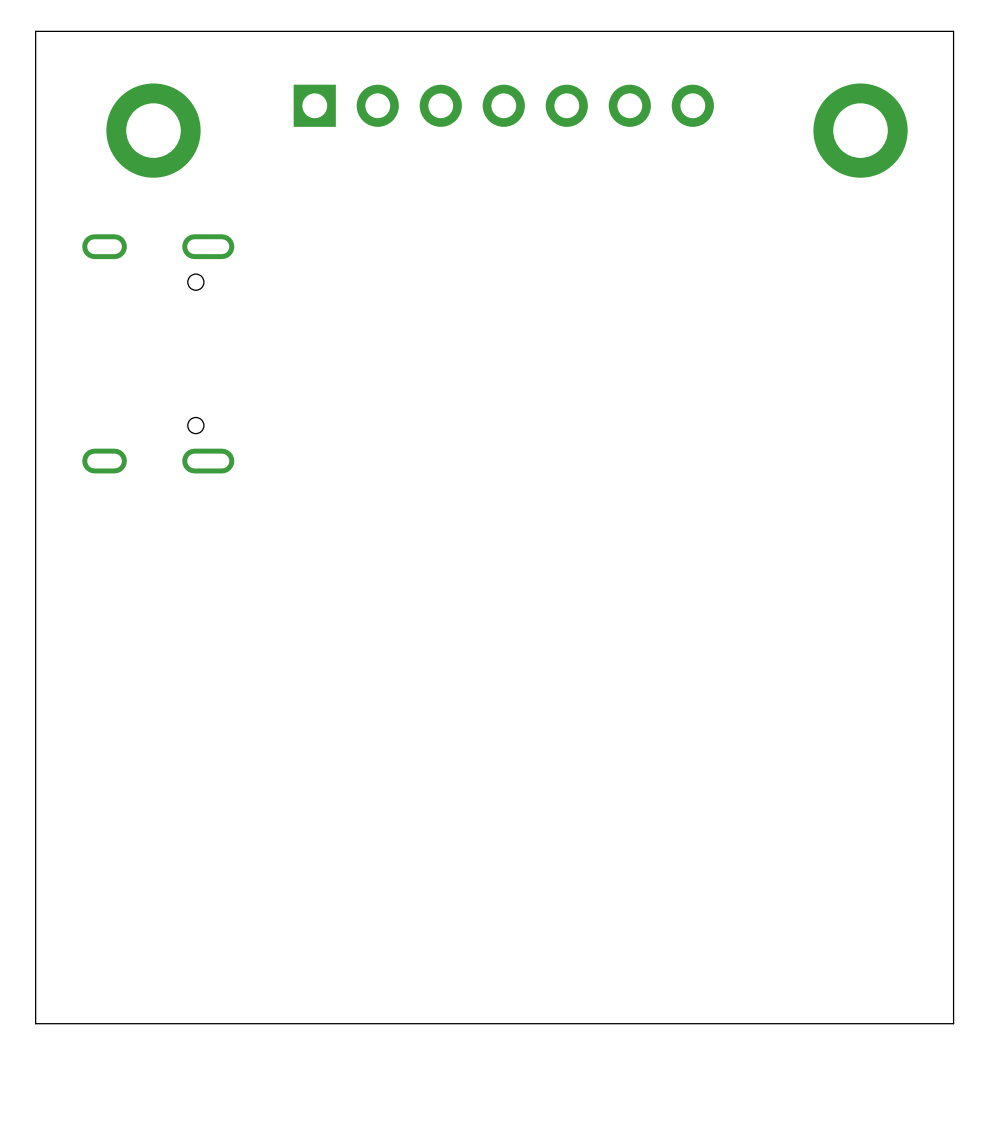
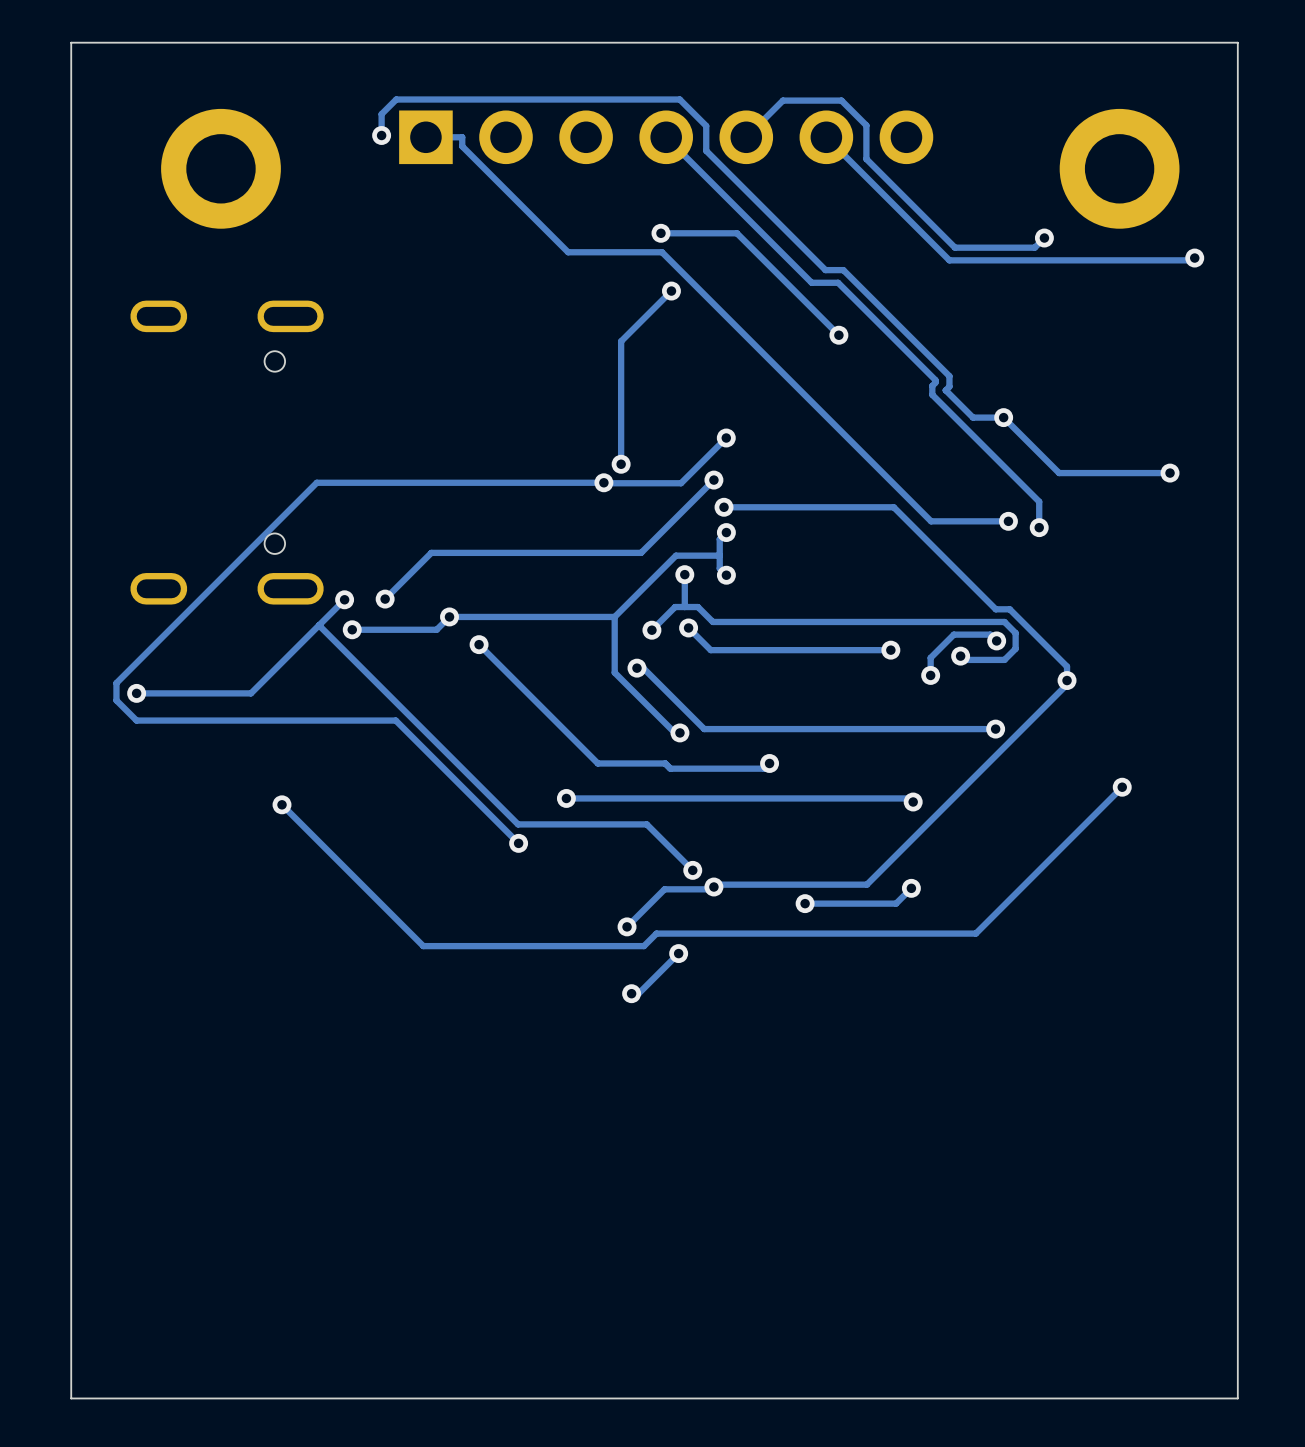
track: none -> (381, 135) (381, 114) (396, 99) (679, 99) (706, 125) (706, 150) (825, 270) (843, 270) (949, 376) (949, 386) (945, 390) (973, 417) (1003, 417) (1059, 473) (1170, 473)
via: none -> (381, 135)
track: none -> (425, 137) (462, 137) (462, 146) (568, 252) (662, 252) (931, 521) (1008, 521)
track: none -> (666, 137) (811, 282) (838, 282) (935, 380) (932, 385) (932, 394) (1039, 501) (1039, 527)
track: none -> (746, 137) (782, 100) (841, 100) (866, 125) (866, 159) (955, 247) (1034, 247) (1044, 238)
track: none -> (826, 137) (949, 260) (1192, 260) (1194, 258)
track: none -> (660, 233) (736, 233) (838, 335)
via: none -> (660, 233)
via: none -> (1044, 238)
via: none -> (1194, 258)
track: none -> (671, 291) (621, 341) (621, 464)
via: none -> (671, 291)
via: none -> (838, 335)
via: none -> (1003, 417)
track: none -> (726, 438) (681, 483) (316, 482) (116, 683) (116, 700) (136, 720) (395, 720) (518, 843)
via: none -> (726, 438)
via: none -> (621, 464)
via: none -> (1170, 473)
track: none -> (713, 480) (641, 552) (431, 552) (385, 599)
via: none -> (713, 480)
via: none -> (603, 482)
track: none -> (724, 507) (893, 507) (995, 609) (1009, 609) (1067, 666) (1067, 684) (866, 884) (716, 884) (711, 889) (664, 889) (627, 926)
via: none -> (724, 507)
via: none -> (1008, 521)
via: none -> (1039, 527)
track: none -> (726, 532) (719, 539) (719, 568) (726, 575)
via: none -> (726, 532)
track: none -> (719, 555) (675, 555) (614, 616)
track: none -> (684, 574) (684, 607)
via: none -> (684, 574)
via: none -> (726, 575)
track: none -> (344, 599) (250, 693) (136, 693)
via: none -> (344, 599)
via: none -> (385, 599)
via: none -> (449, 616)
track: none -> (614, 616) (614, 672) (674, 732) (679, 732)
track: none -> (614, 616) (449, 616) (436, 629) (352, 629)
track: none -> (319, 625) (518, 824) (646, 824) (692, 870)
track: none -> (688, 627) (710, 650) (890, 650)
via: none -> (688, 627)
via: none -> (352, 629)
track: none -> (651, 630) (675, 607) (697, 607) (712, 621) (1004, 621) (1015, 633) (1015, 648) (1004, 659) (964, 659) (960, 656)
via: none -> (651, 630)
track: none -> (996, 640) (990, 634) (953, 634) (930, 657) (930, 675)
via: none -> (996, 640)
track: none -> (479, 644) (597, 763) (665, 763) (670, 768) (764, 768) (769, 763)
via: none -> (479, 644)
via: none -> (890, 650)
via: none -> (960, 656)
track: none -> (636, 668) (643, 668) (704, 729) (995, 729)
via: none -> (636, 668)
via: none -> (930, 675)
via: none -> (1067, 680)
via: none -> (136, 693)
via: none -> (995, 729)
via: none -> (679, 732)
via: none -> (769, 763)
track: none -> (1122, 787) (975, 933) (656, 933) (643, 946) (423, 946) (282, 804)
via: none -> (1122, 787)
track: none -> (566, 798) (909, 798) (913, 802)
via: none -> (566, 798)
via: none -> (913, 802)
via: none -> (282, 804)
via: none -> (518, 843)
via: none -> (692, 870)
via: none -> (713, 887)
track: none -> (911, 888) (896, 903) (805, 903)
via: none -> (911, 888)
via: none -> (805, 903)
via: none -> (627, 926)
track: none -> (678, 953) (638, 993) (631, 993)
via: none -> (678, 953)
via: none -> (631, 993)
board edge: (953, 1023) (35, 1023) -> (1237, 1303) (1237, 1398) (71, 1398) (71, 1303)

